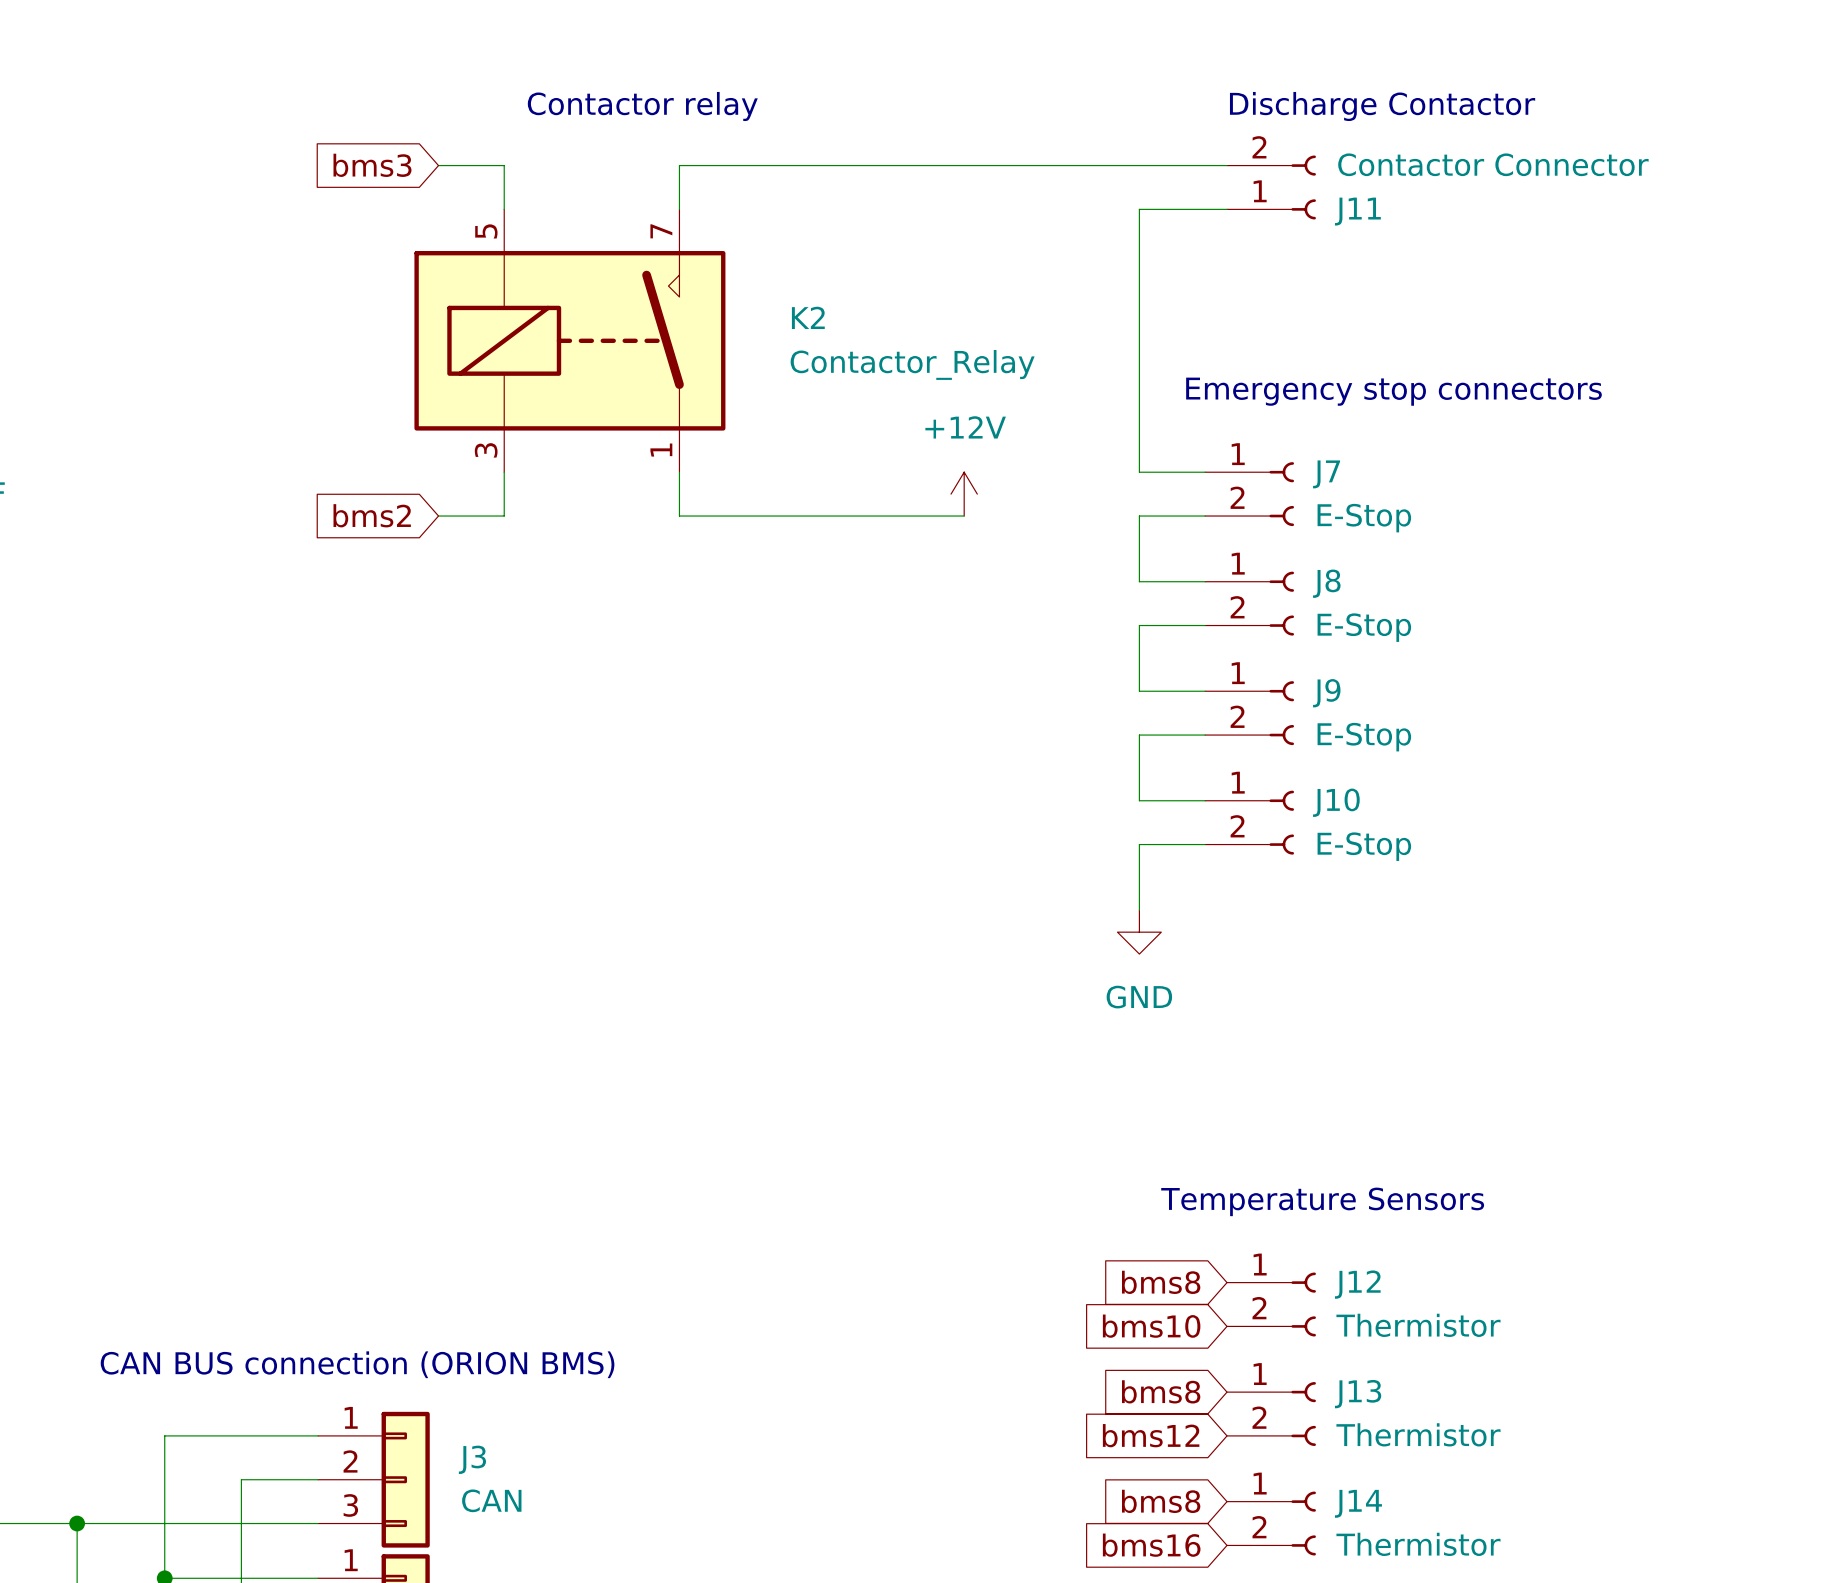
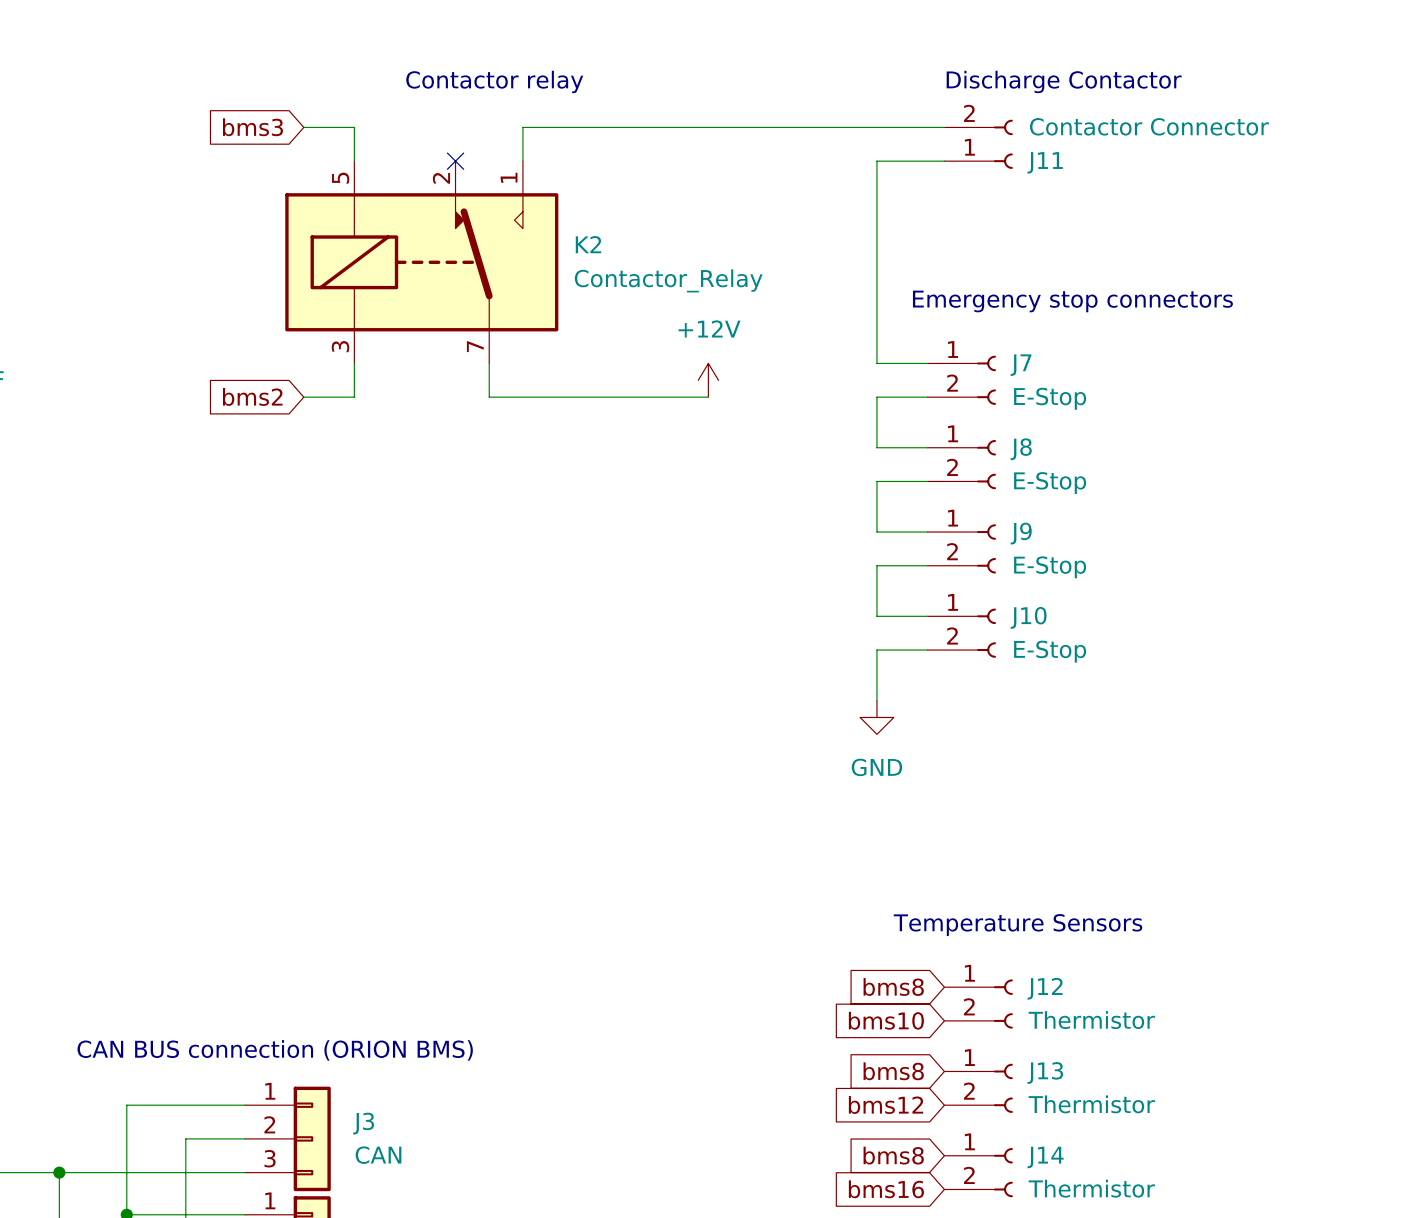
global label position: bms3 (372, 165) -> bms3 (252, 127)
wire: none -> (303, 127) (337, 127)
wire: (460, 165) (504, 165) (504, 209) -> (354, 127) (354, 161)
K2 symbol: [414, 209, 726, 473] -> [285, 161, 559, 364]
no-connect mark: none -> (455, 161)
wire: (504, 472) (504, 516) (460, 516) -> (354, 363) (354, 397)
wire: (679, 472) (679, 516) -> (489, 363) (489, 397) (522, 397)
power symbol position: +12V (964, 494) -> +12V (708, 380)
global label position: bms2 (372, 515) -> bms2 (252, 396)
wire: none -> (303, 397) (337, 397)
wire: (920, 516) (964, 516) -> none

